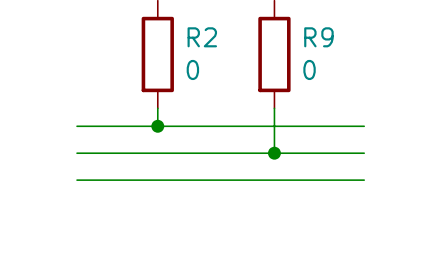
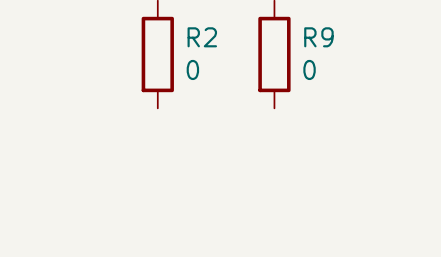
wire: (157, 108) (157, 126) -> none
wire: (274, 108) (274, 153) -> none
wire: (77, 126) (364, 126) -> none
junction: (157, 126) -> none
wire: (77, 153) (364, 153) -> none
junction: (274, 153) -> none
wire: (77, 180) (364, 180) -> none

